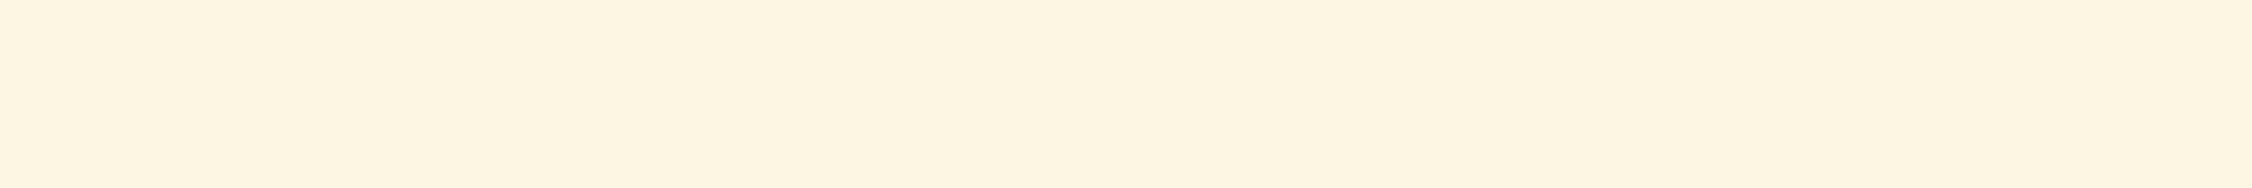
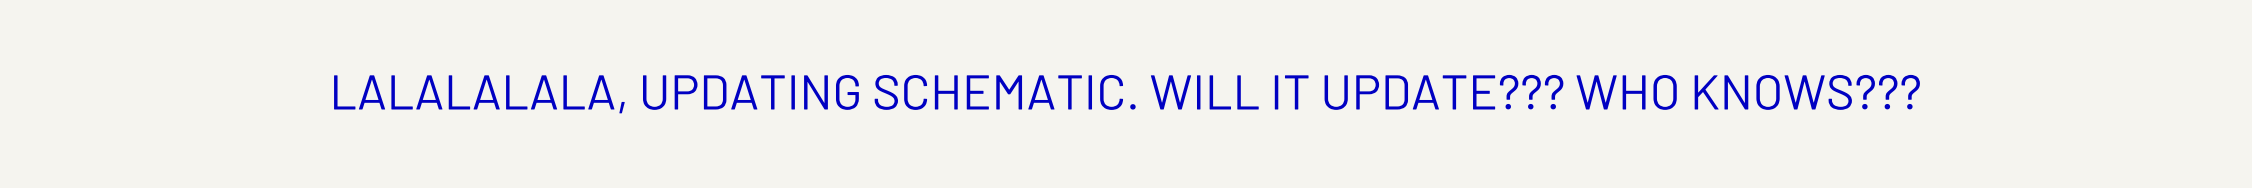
text: none -> LALALALALA, UPDATING SCHEMATIC. WILL IT UPDATE??? WHO KNOWS??? (1127, 94)

